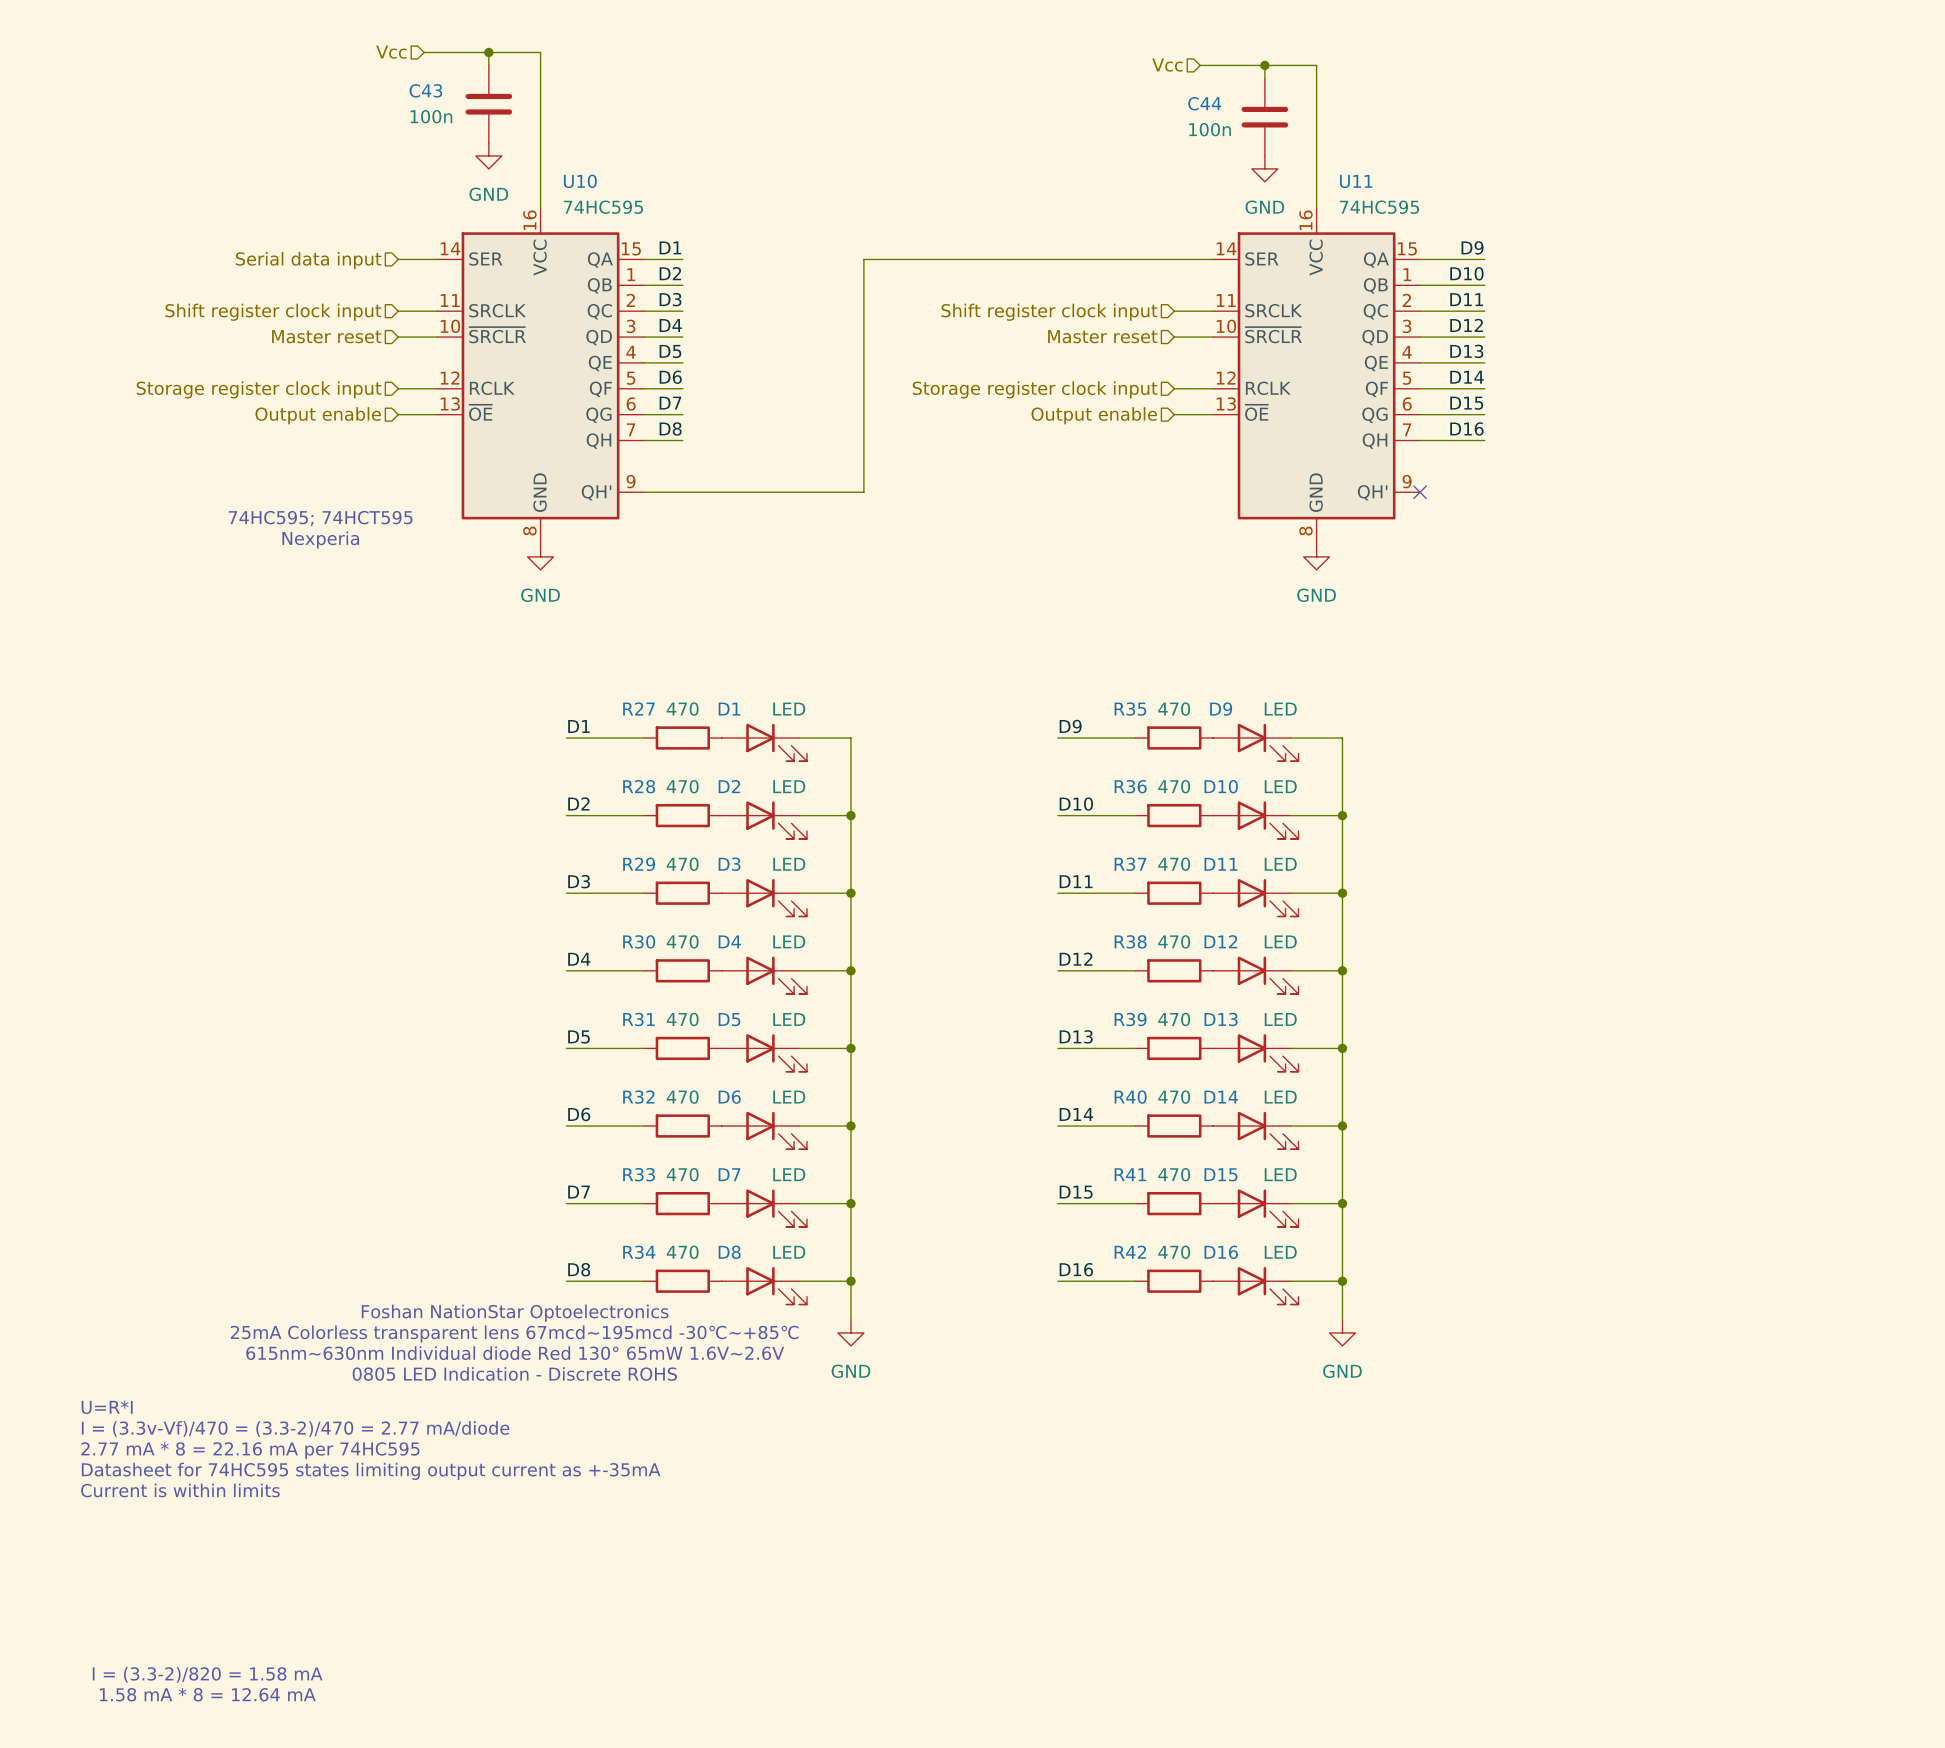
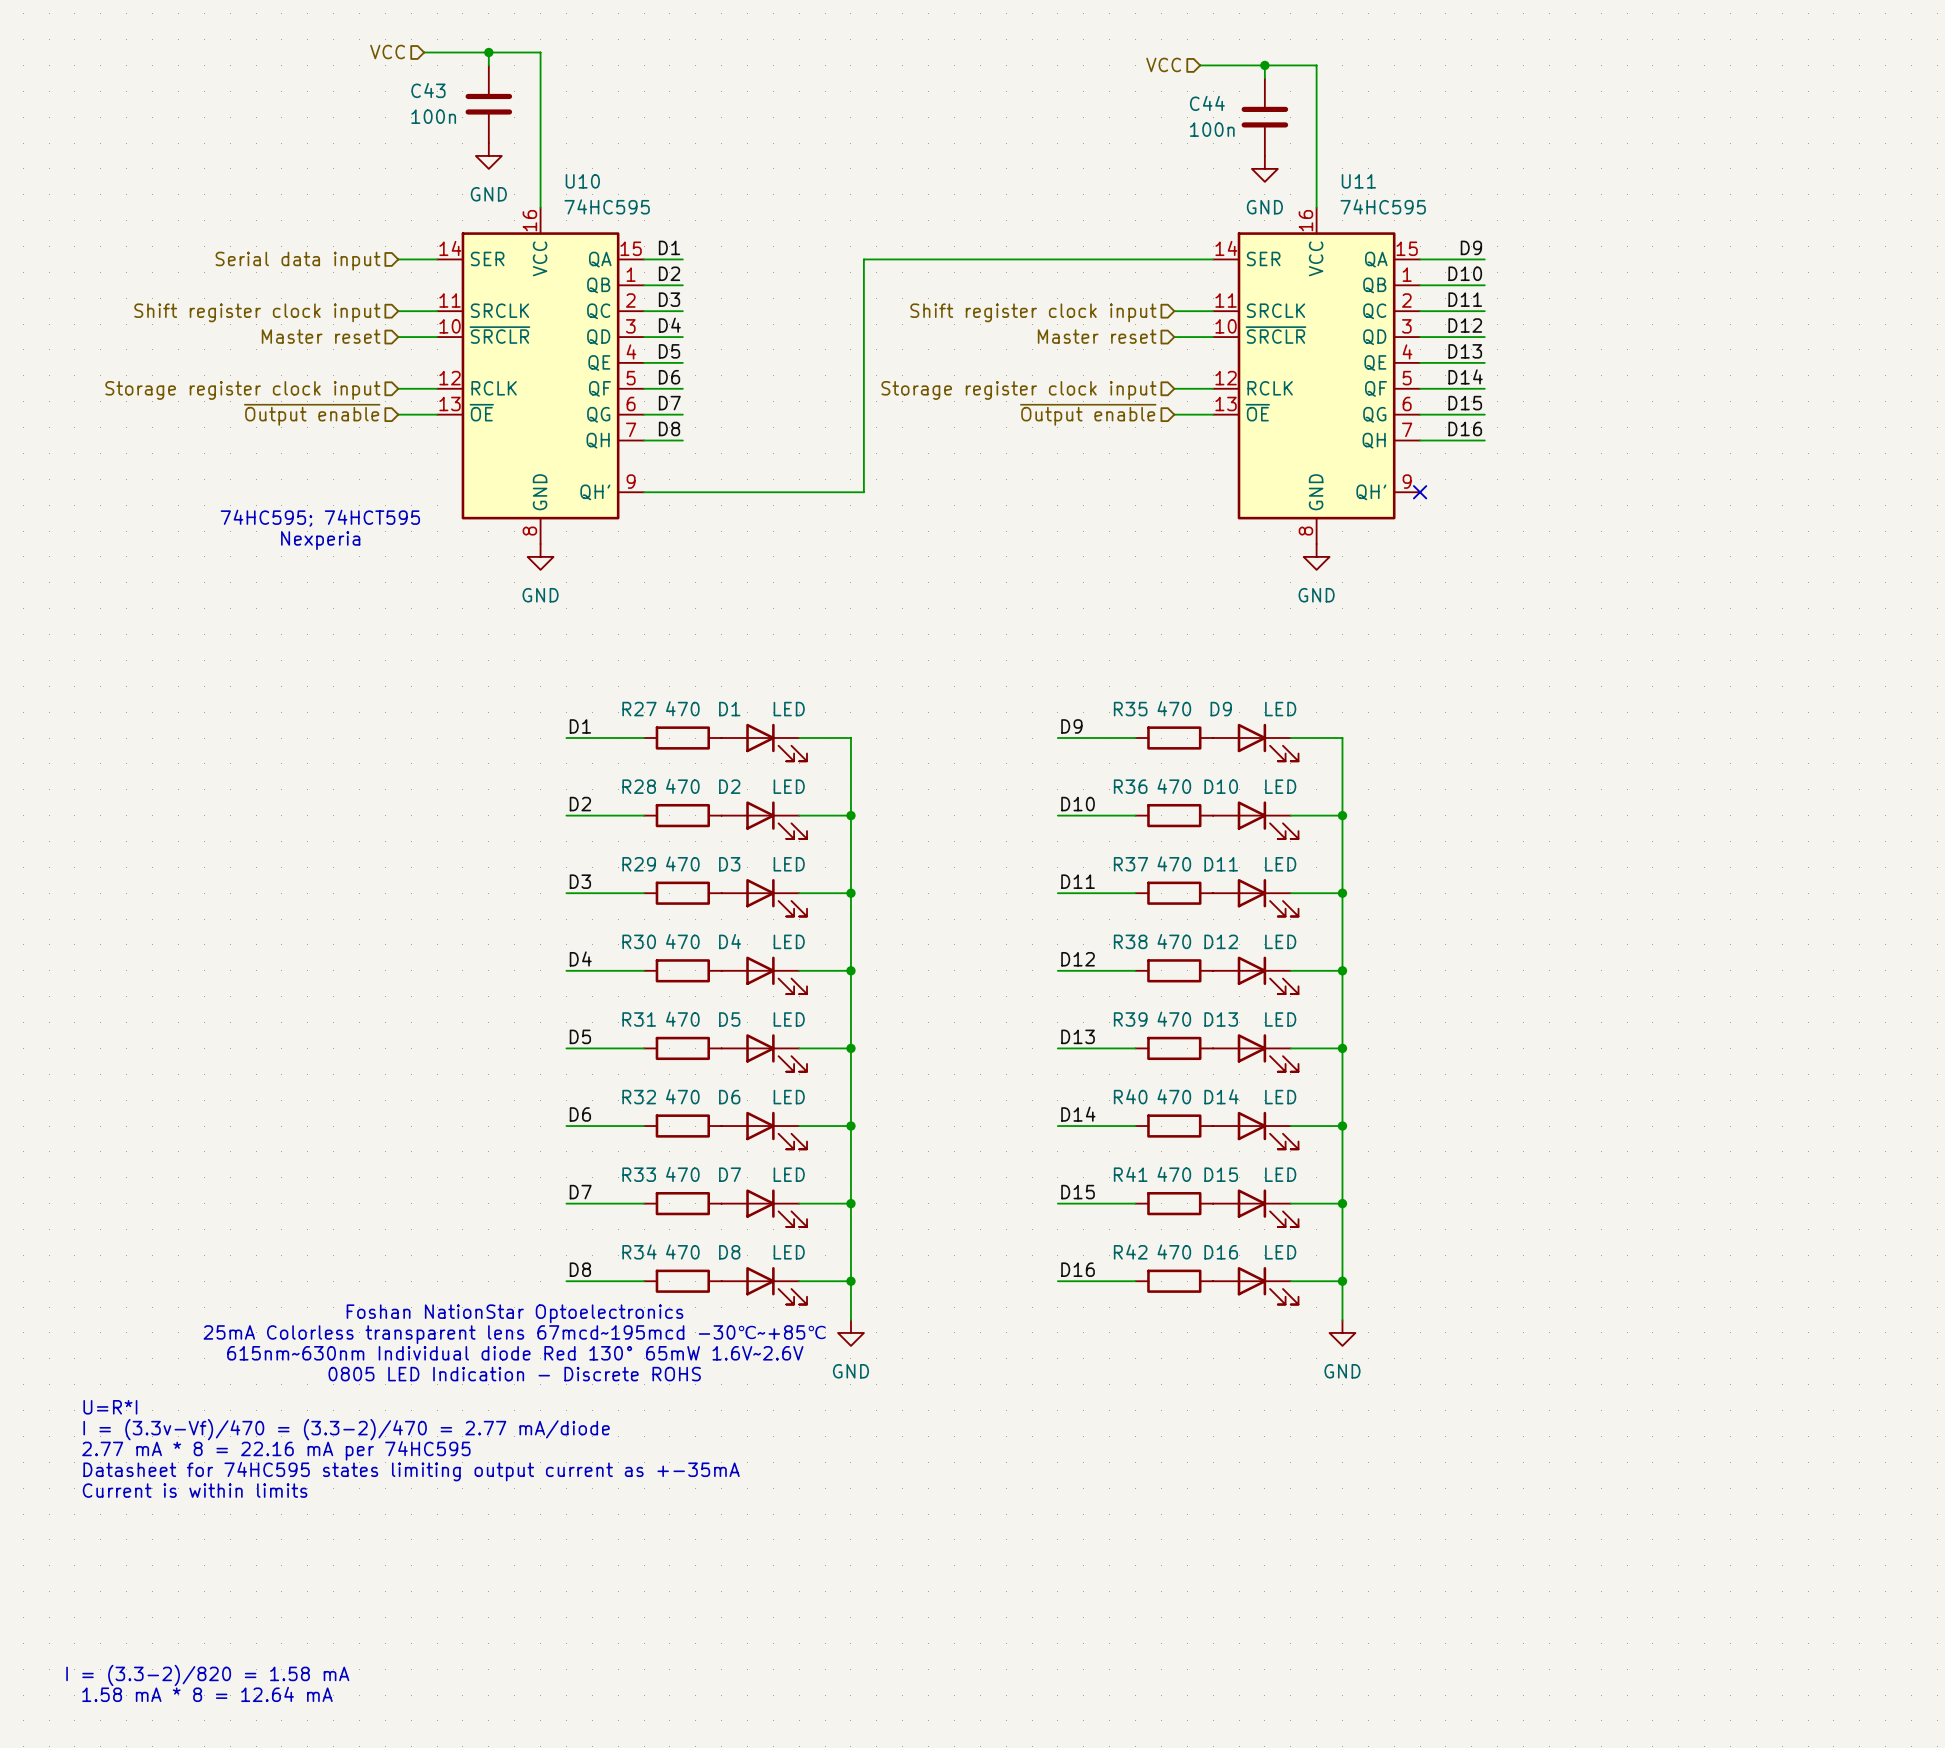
hierarchical label: Vcc (391, 52) -> VCC (387, 52)
hierarchical label: Vcc (1167, 65) -> VCC (1163, 64)
hierarchical label: Output enable (318, 415) -> ~{Output enable} (312, 414)
hierarchical label: Output enable (1094, 415) -> ~{Output enable} (1088, 414)

